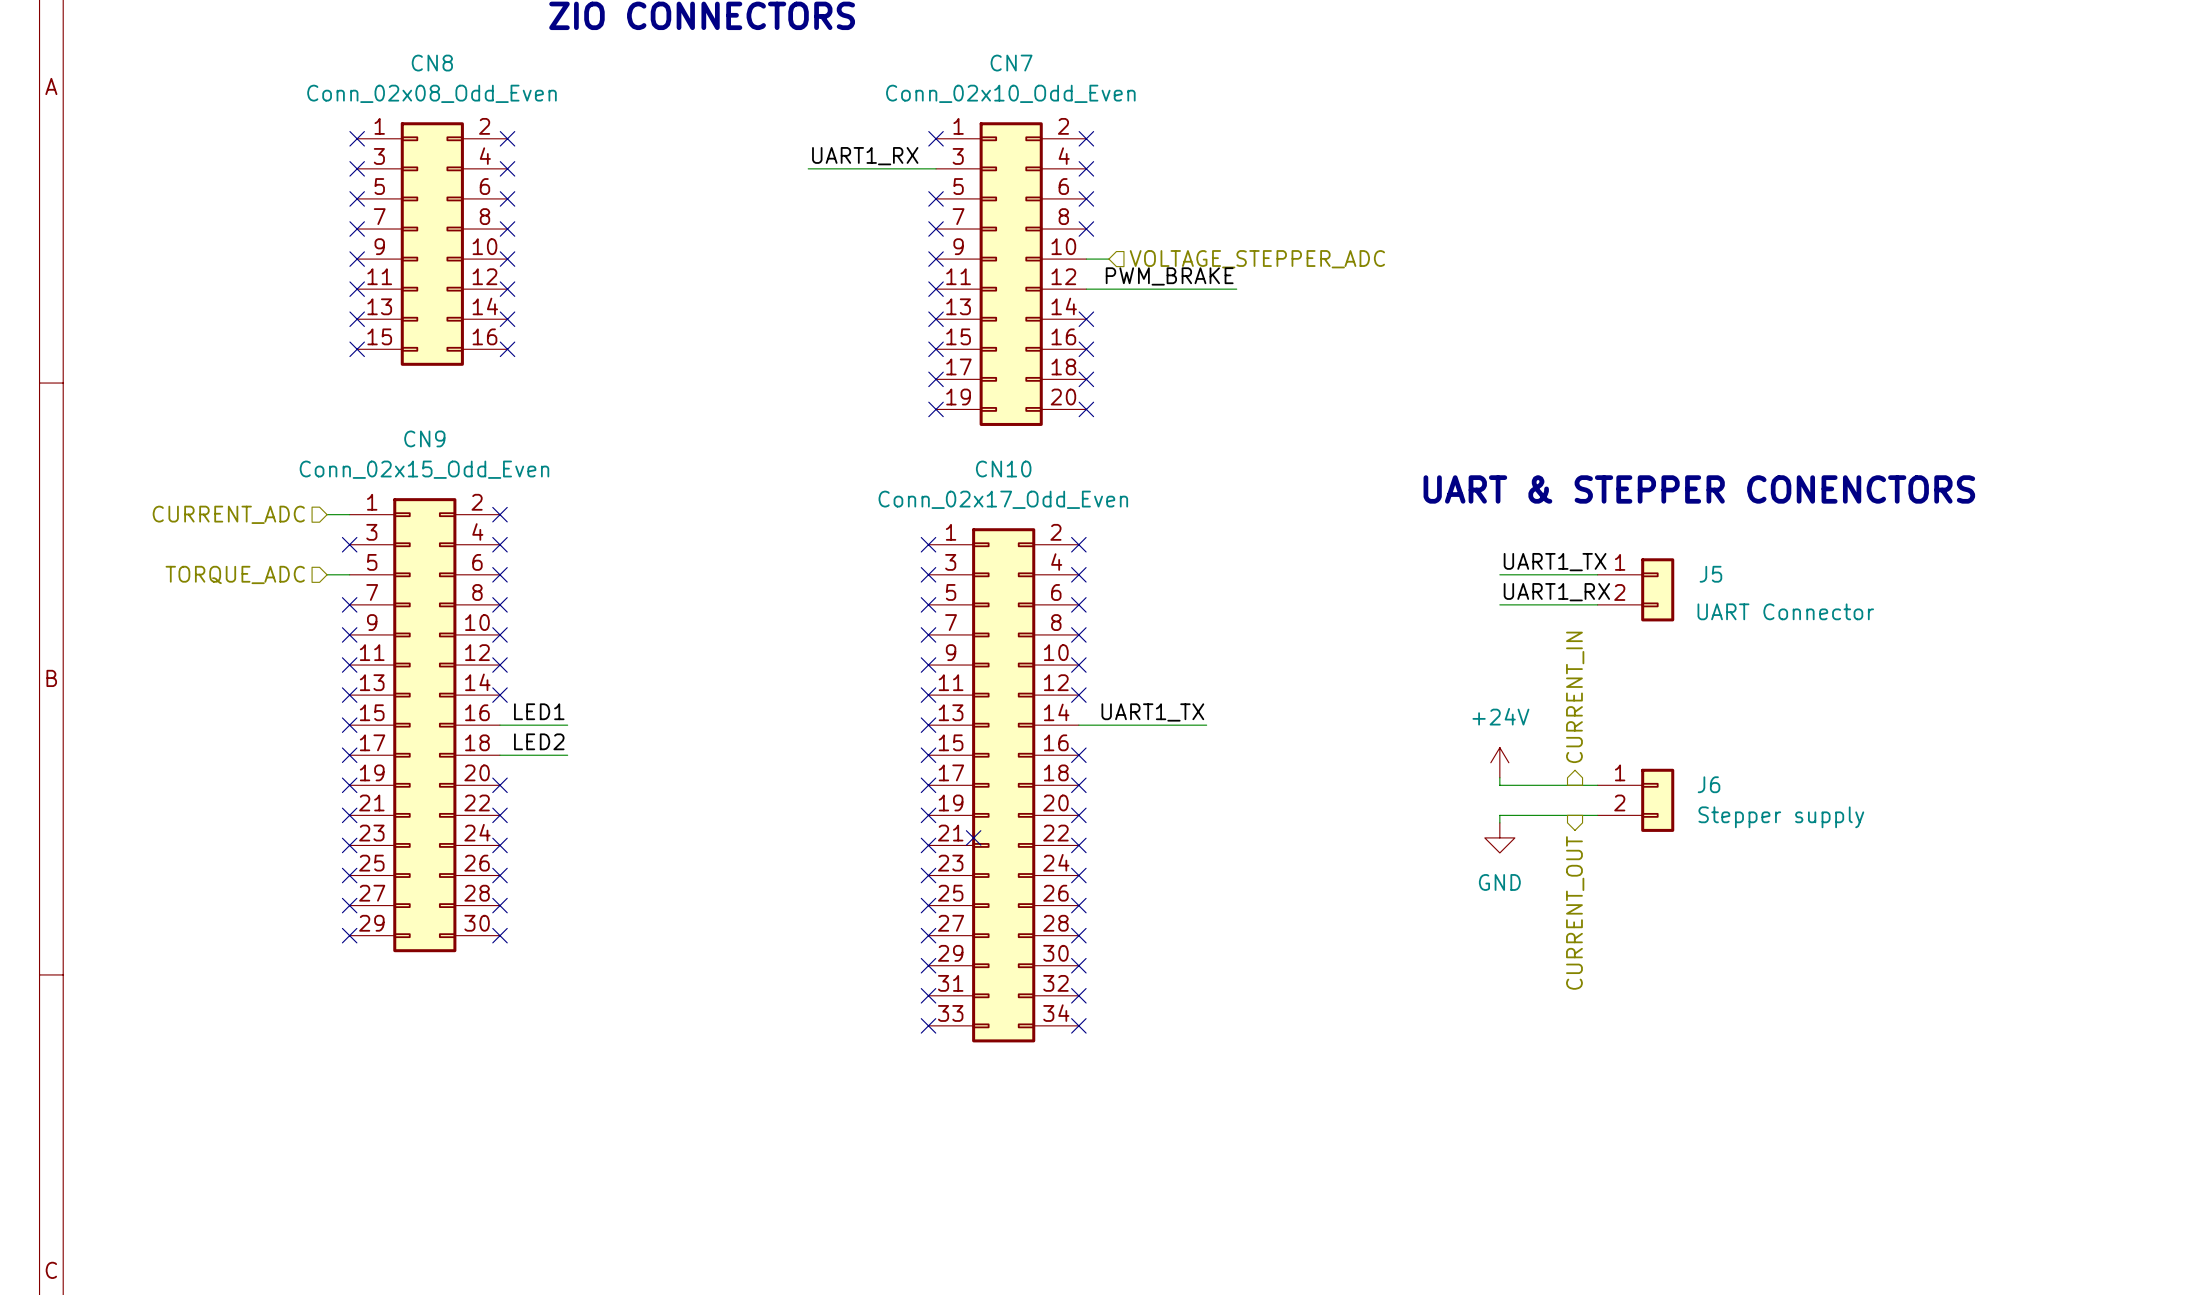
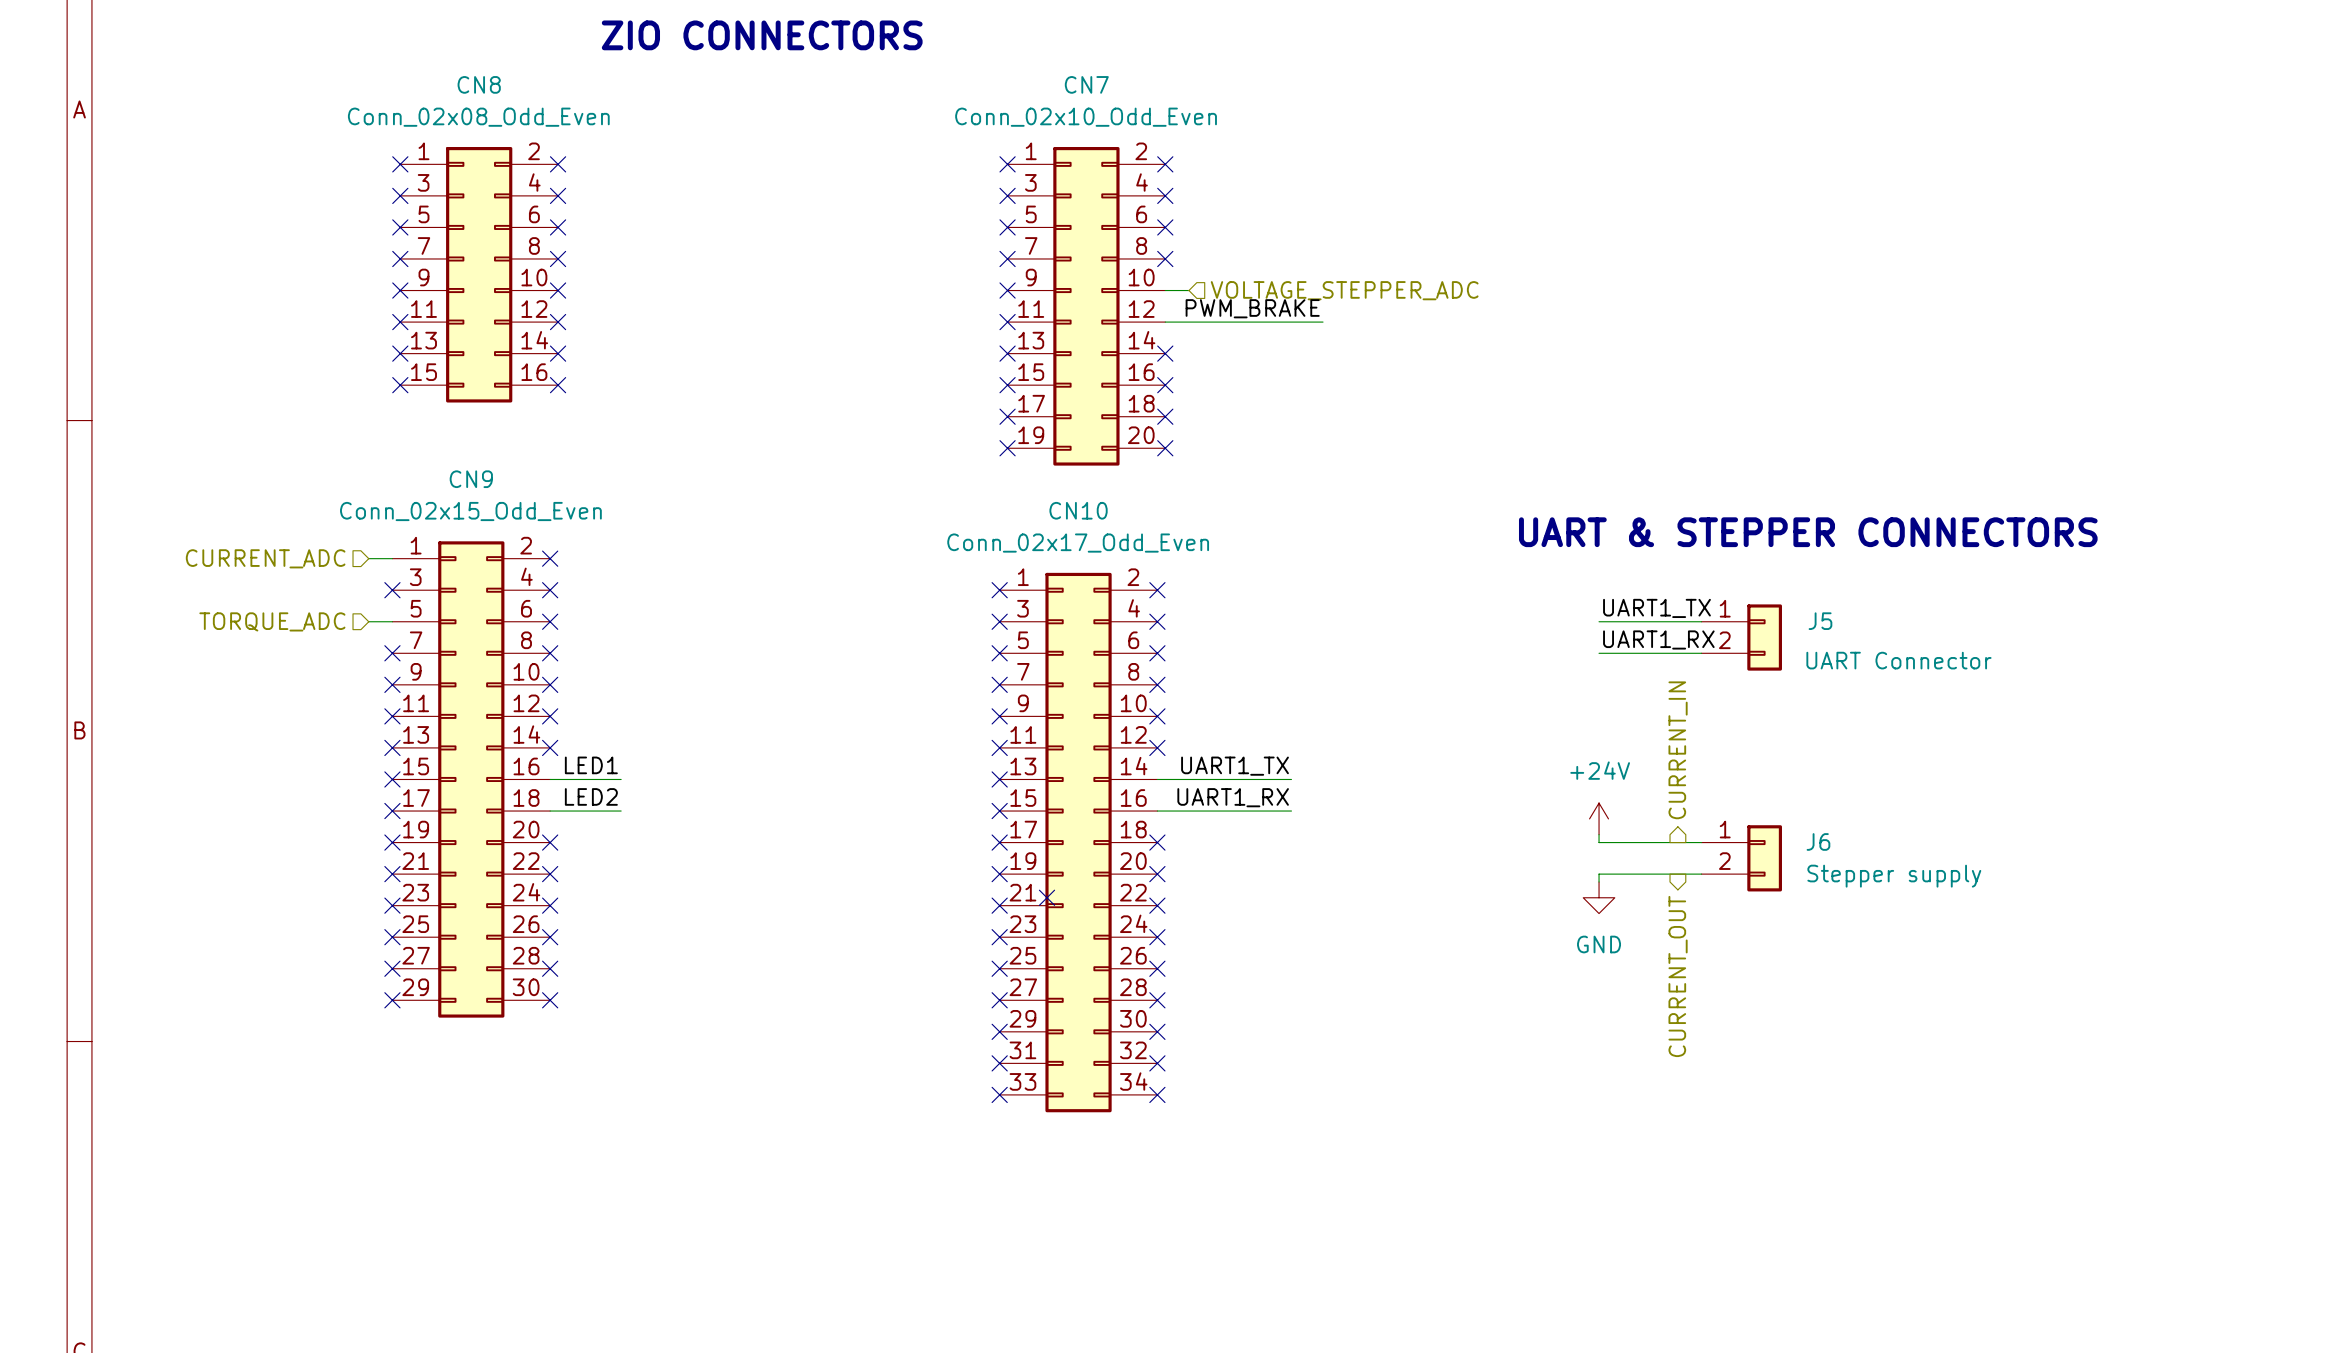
label: UART1_RX (865, 156) -> none
wire: (808, 168) (936, 168) -> none
no-connect mark: none -> (1007, 195)
text: UART & STEPPER CONENCTORS (1699, 489) -> UART & STEPPER CONNECTORS (1808, 532)
label: none -> UART1_RX (1233, 797)
wire: none -> (1157, 811) (1291, 811)
no-connect mark: (1078, 755) -> none

